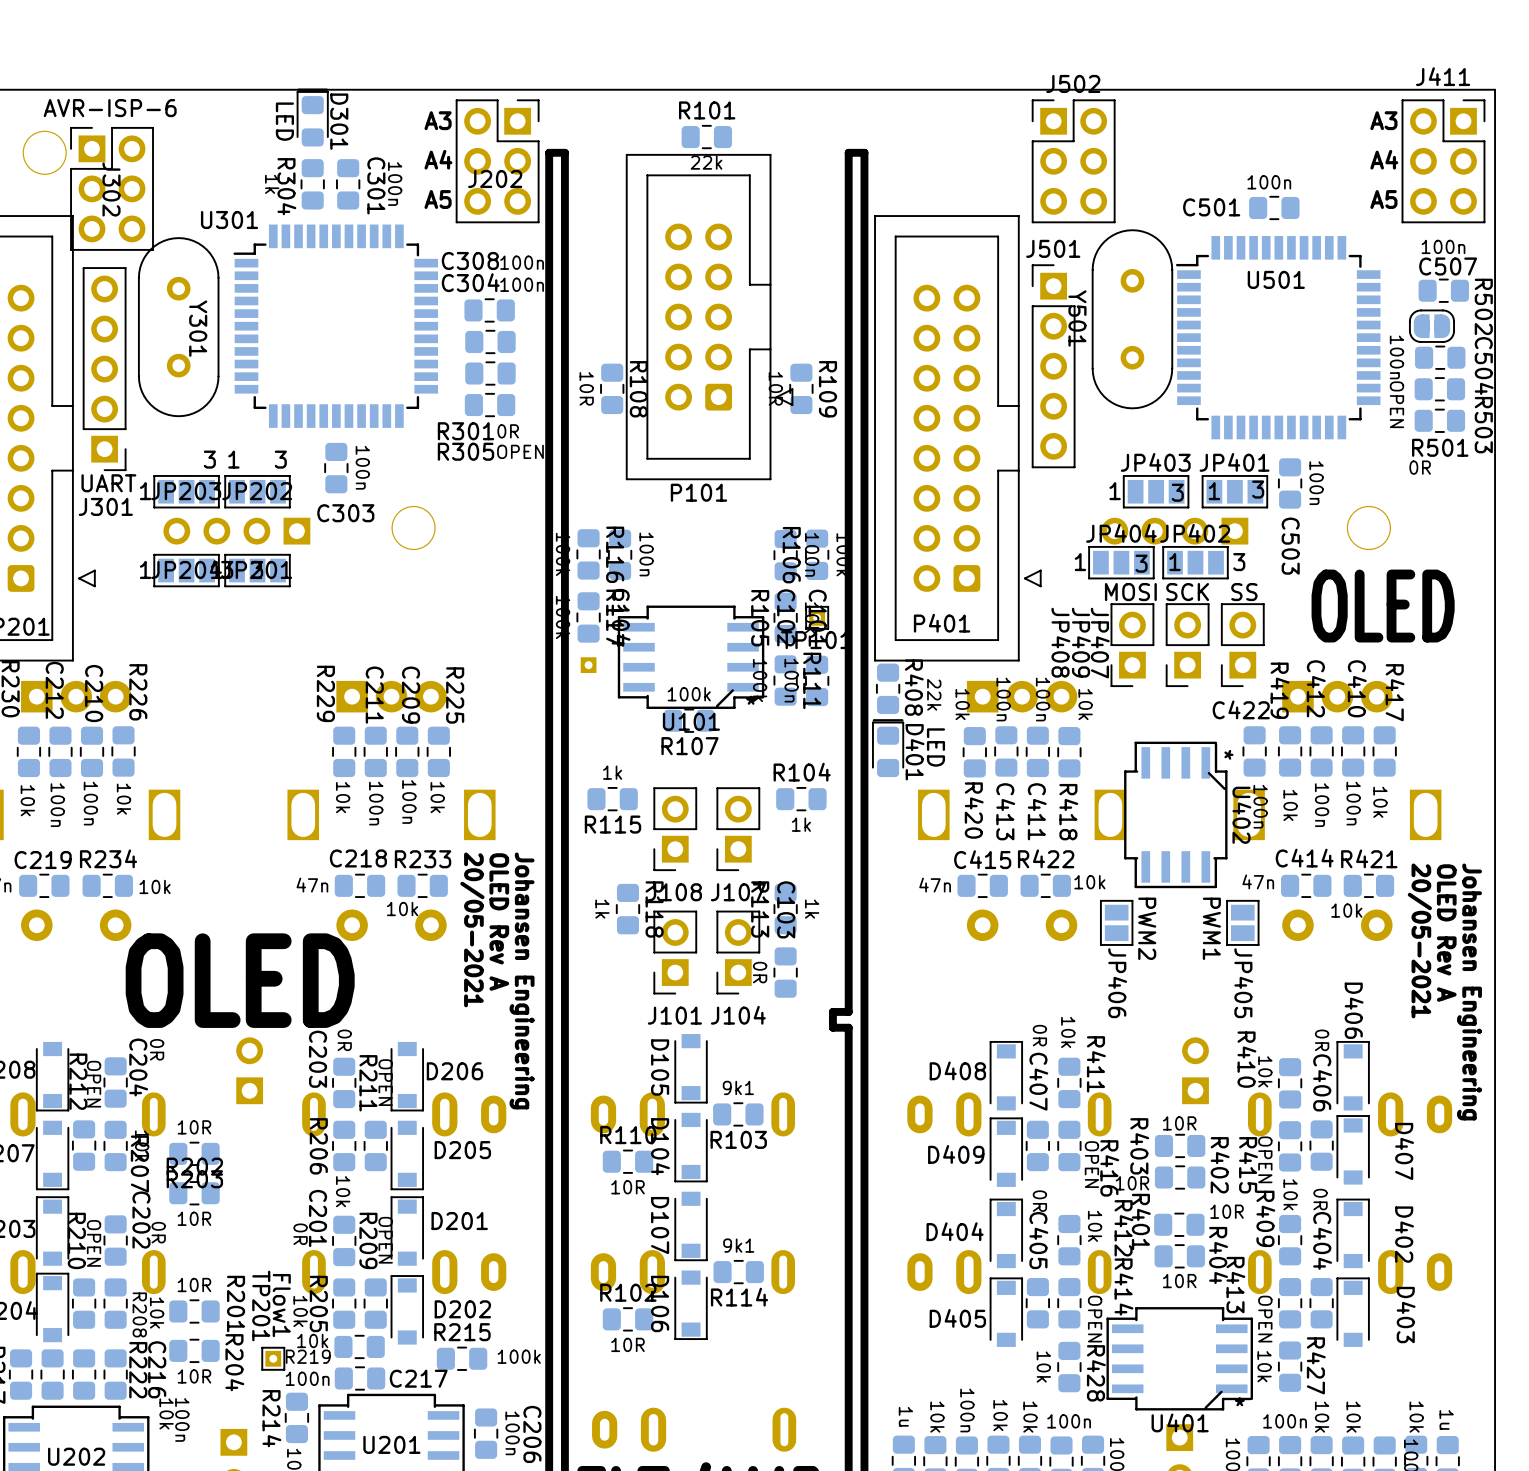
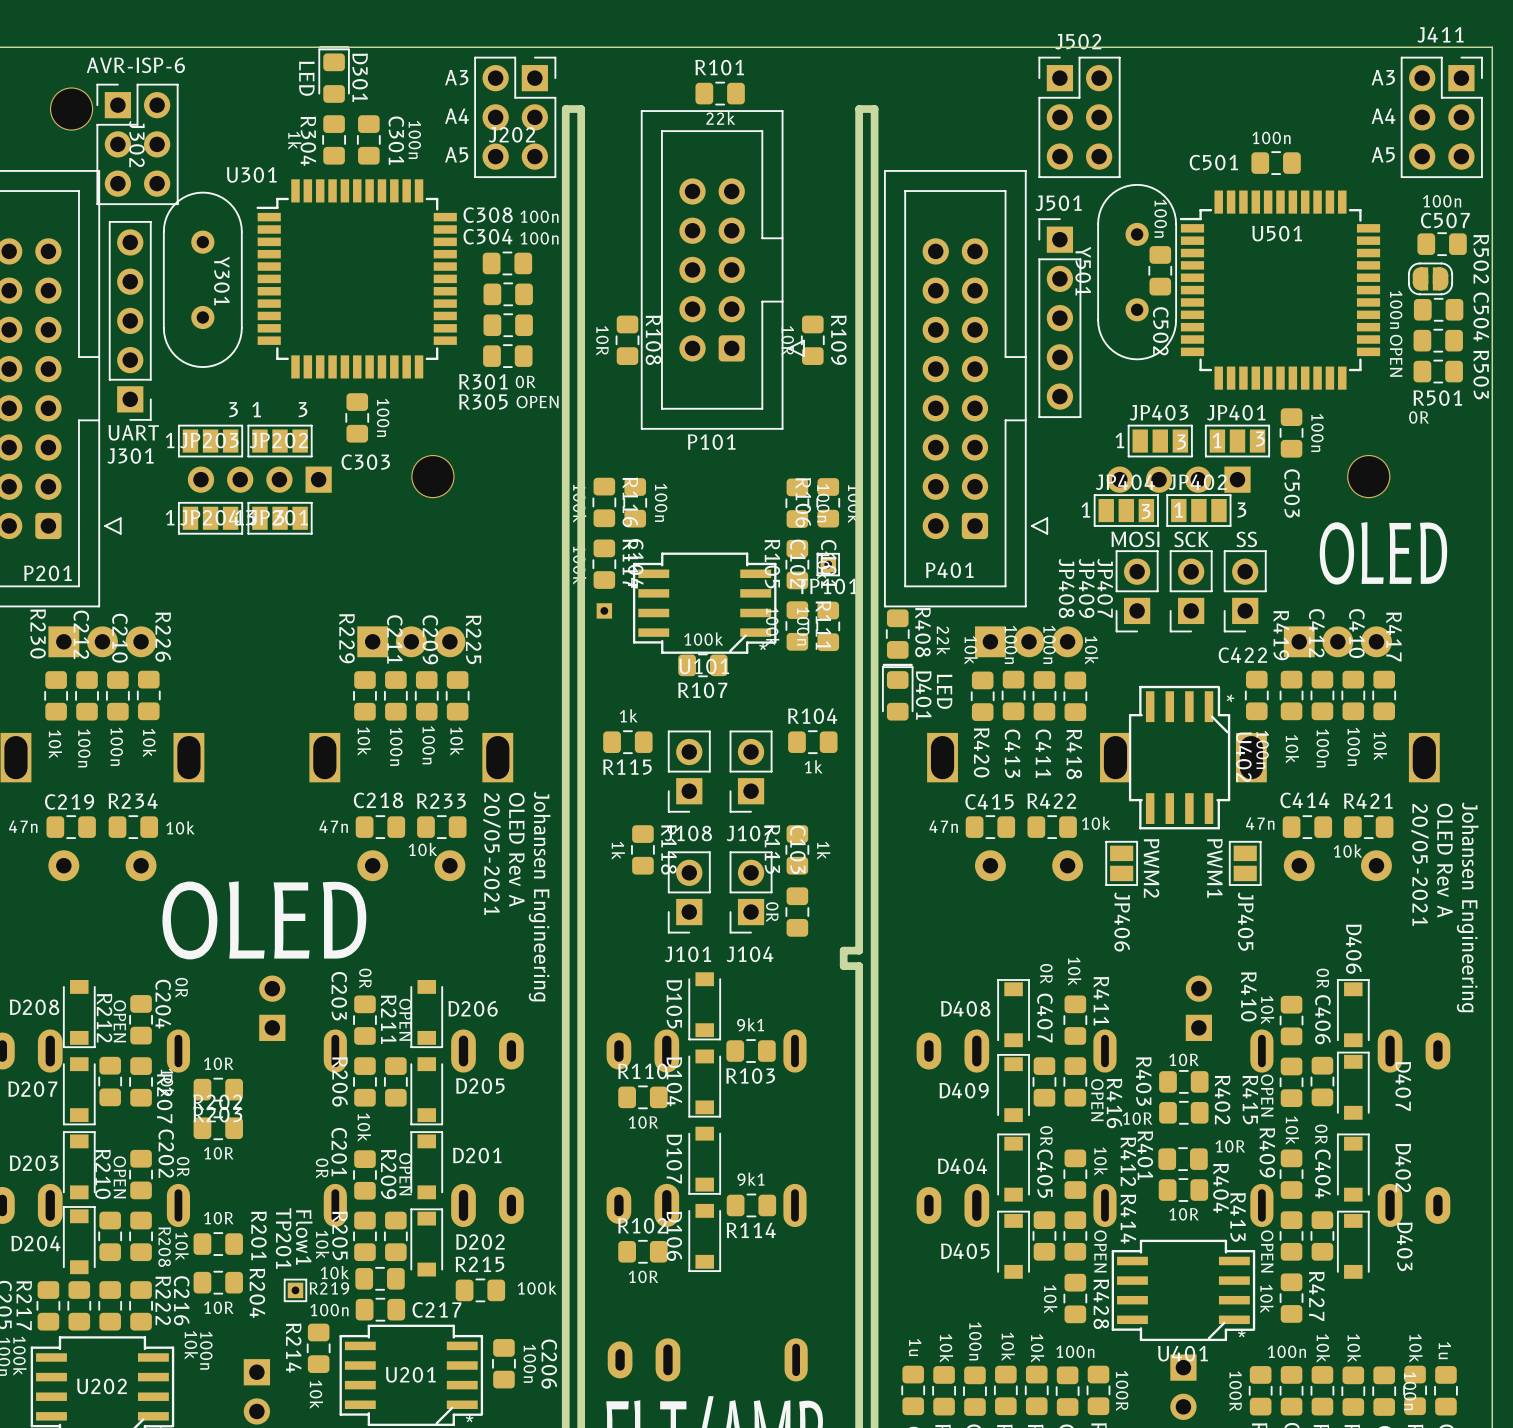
C502: none -> 100n (1160, 270)

